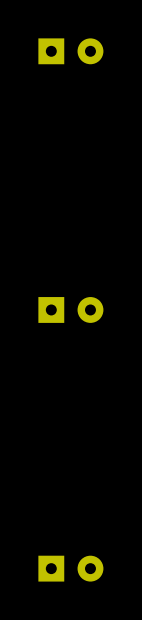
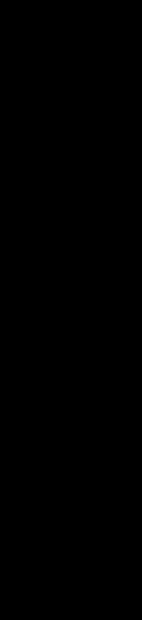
part: (70, 51) -> none
part: (70, 309) -> none
part: (70, 568) -> none

